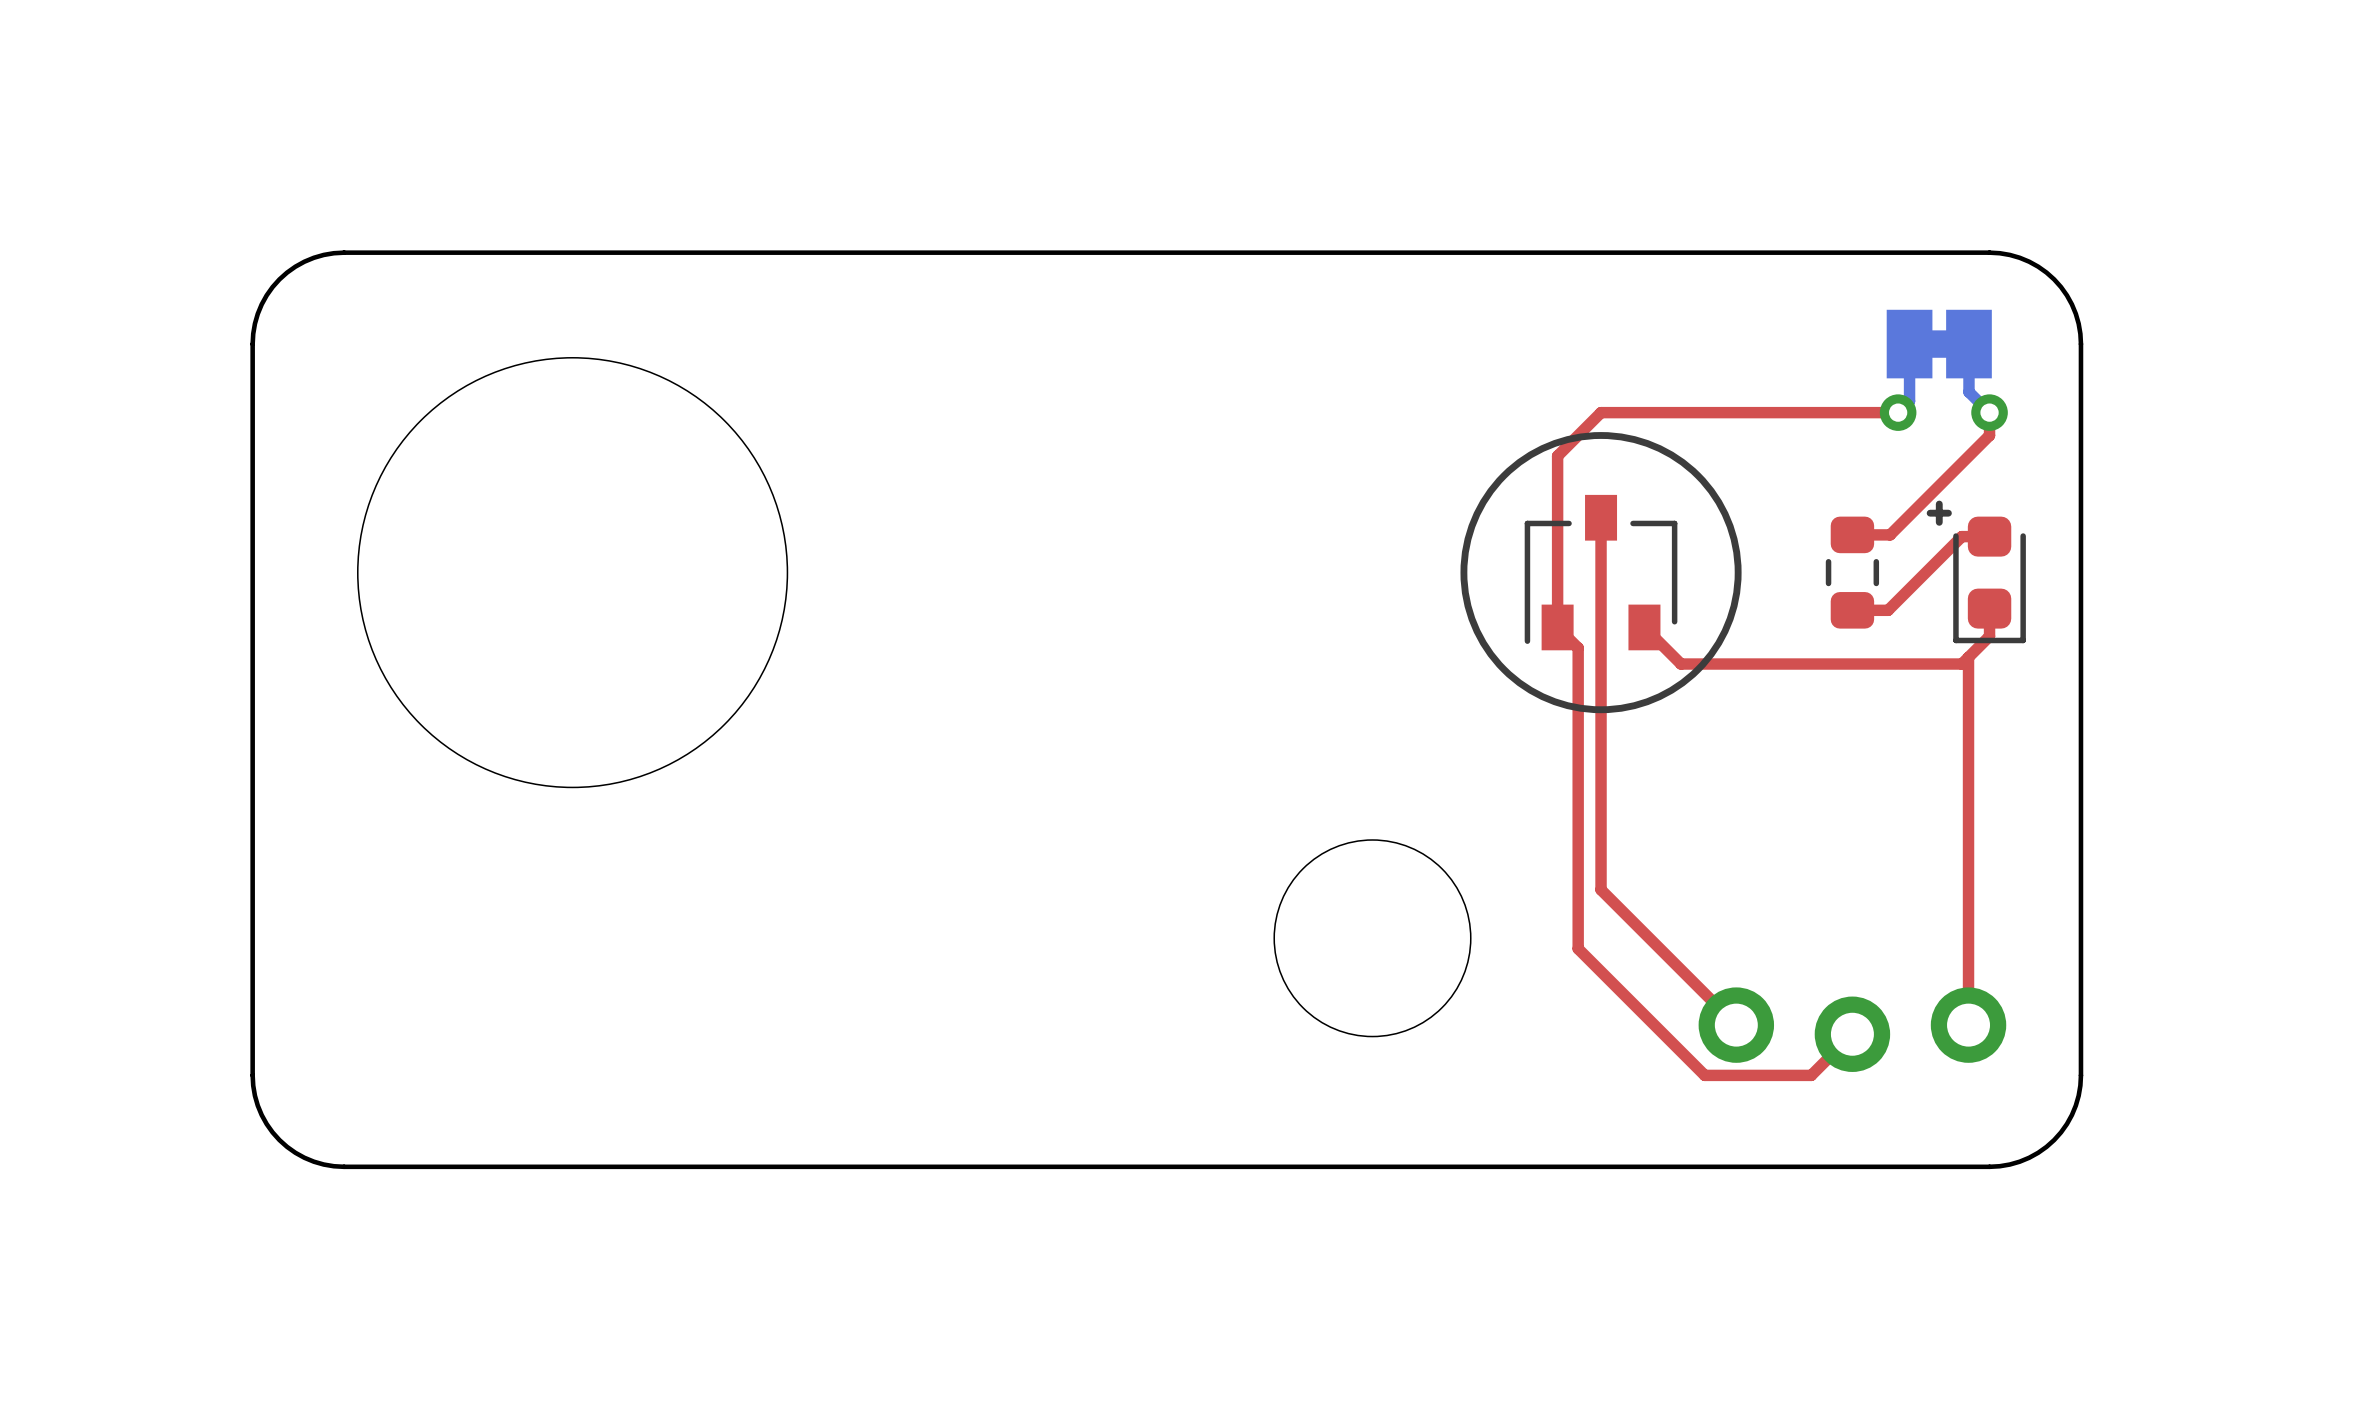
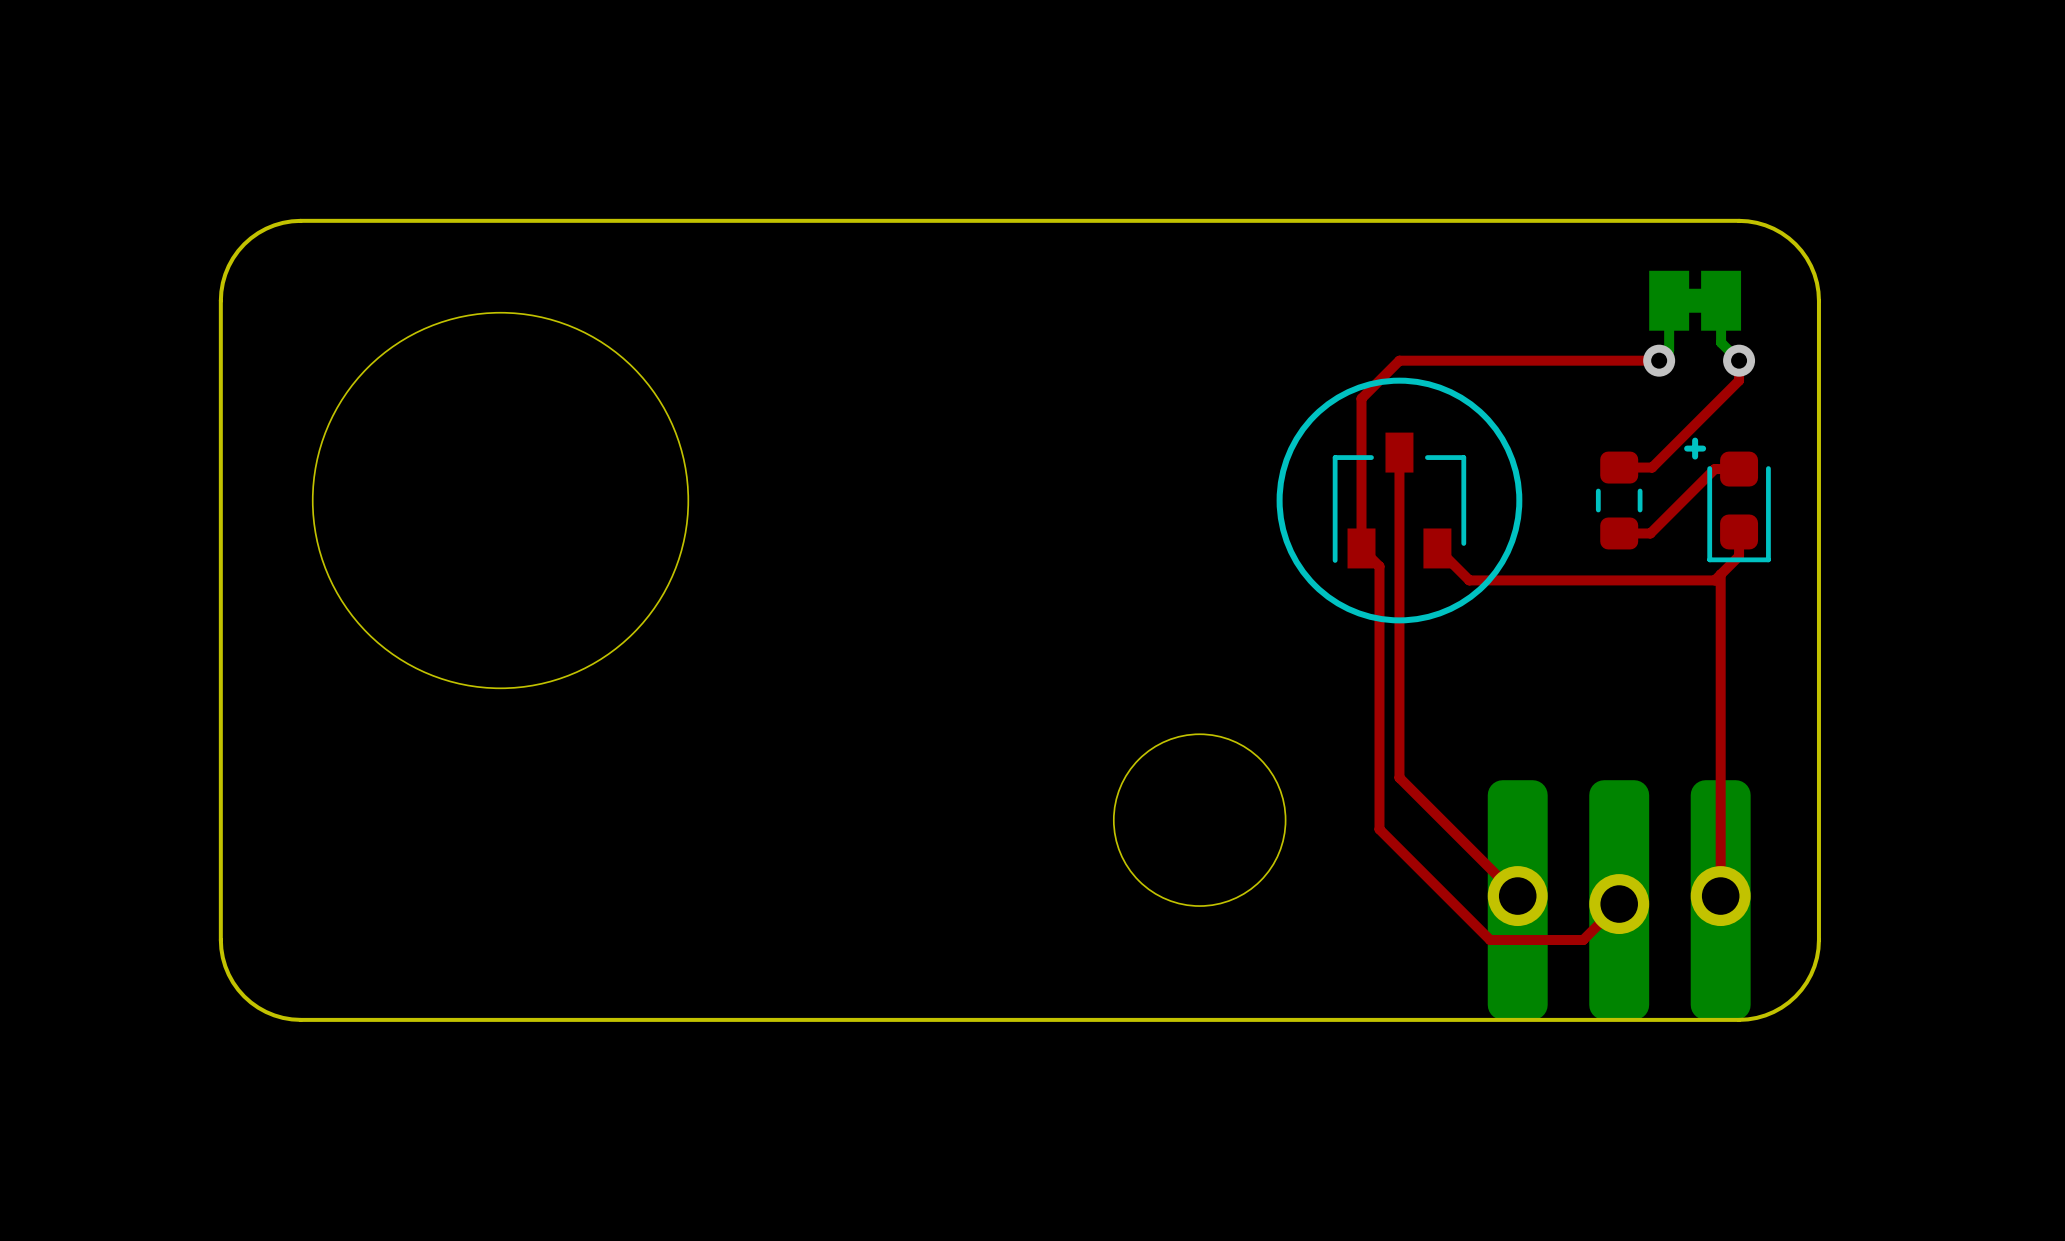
part footprint: [1698, 987, 2007, 1072] -> [1487, 780, 1751, 1020]

